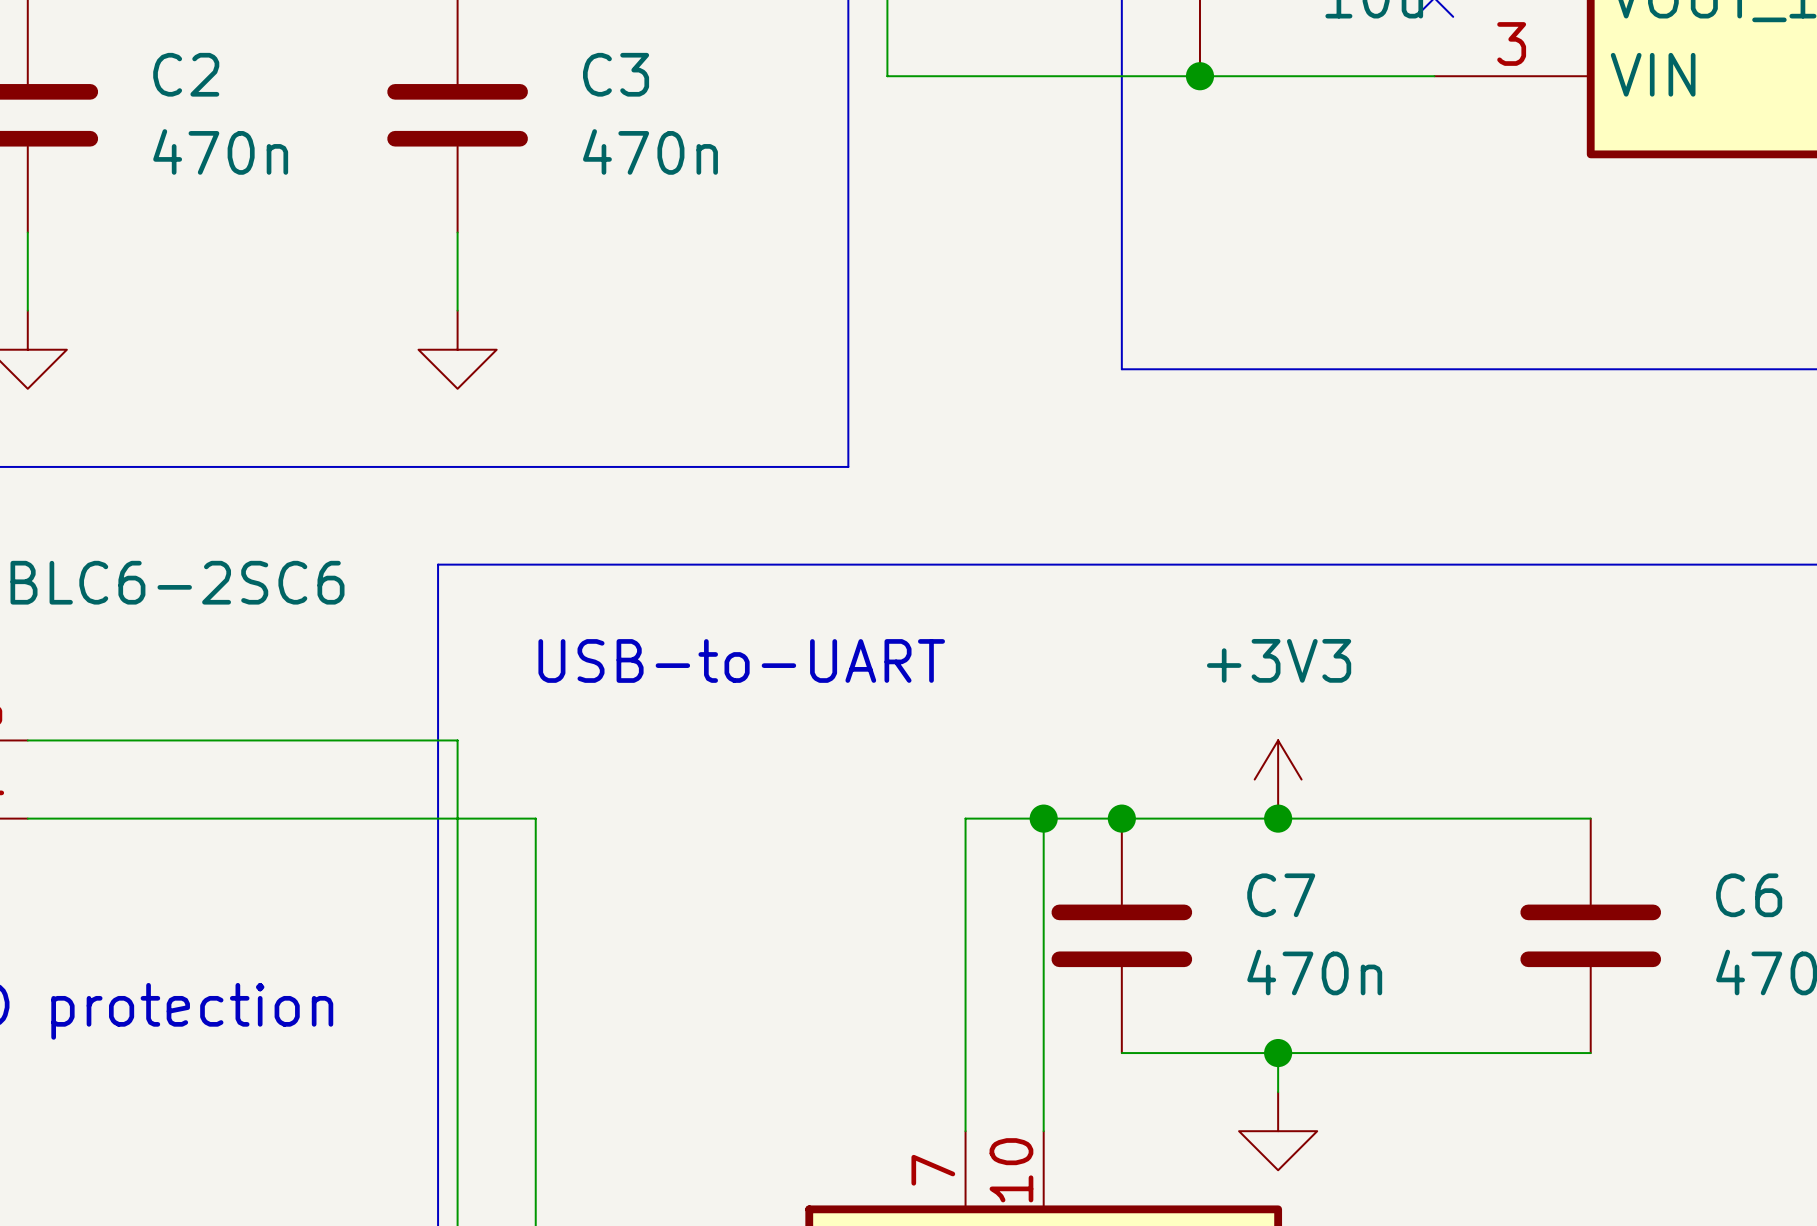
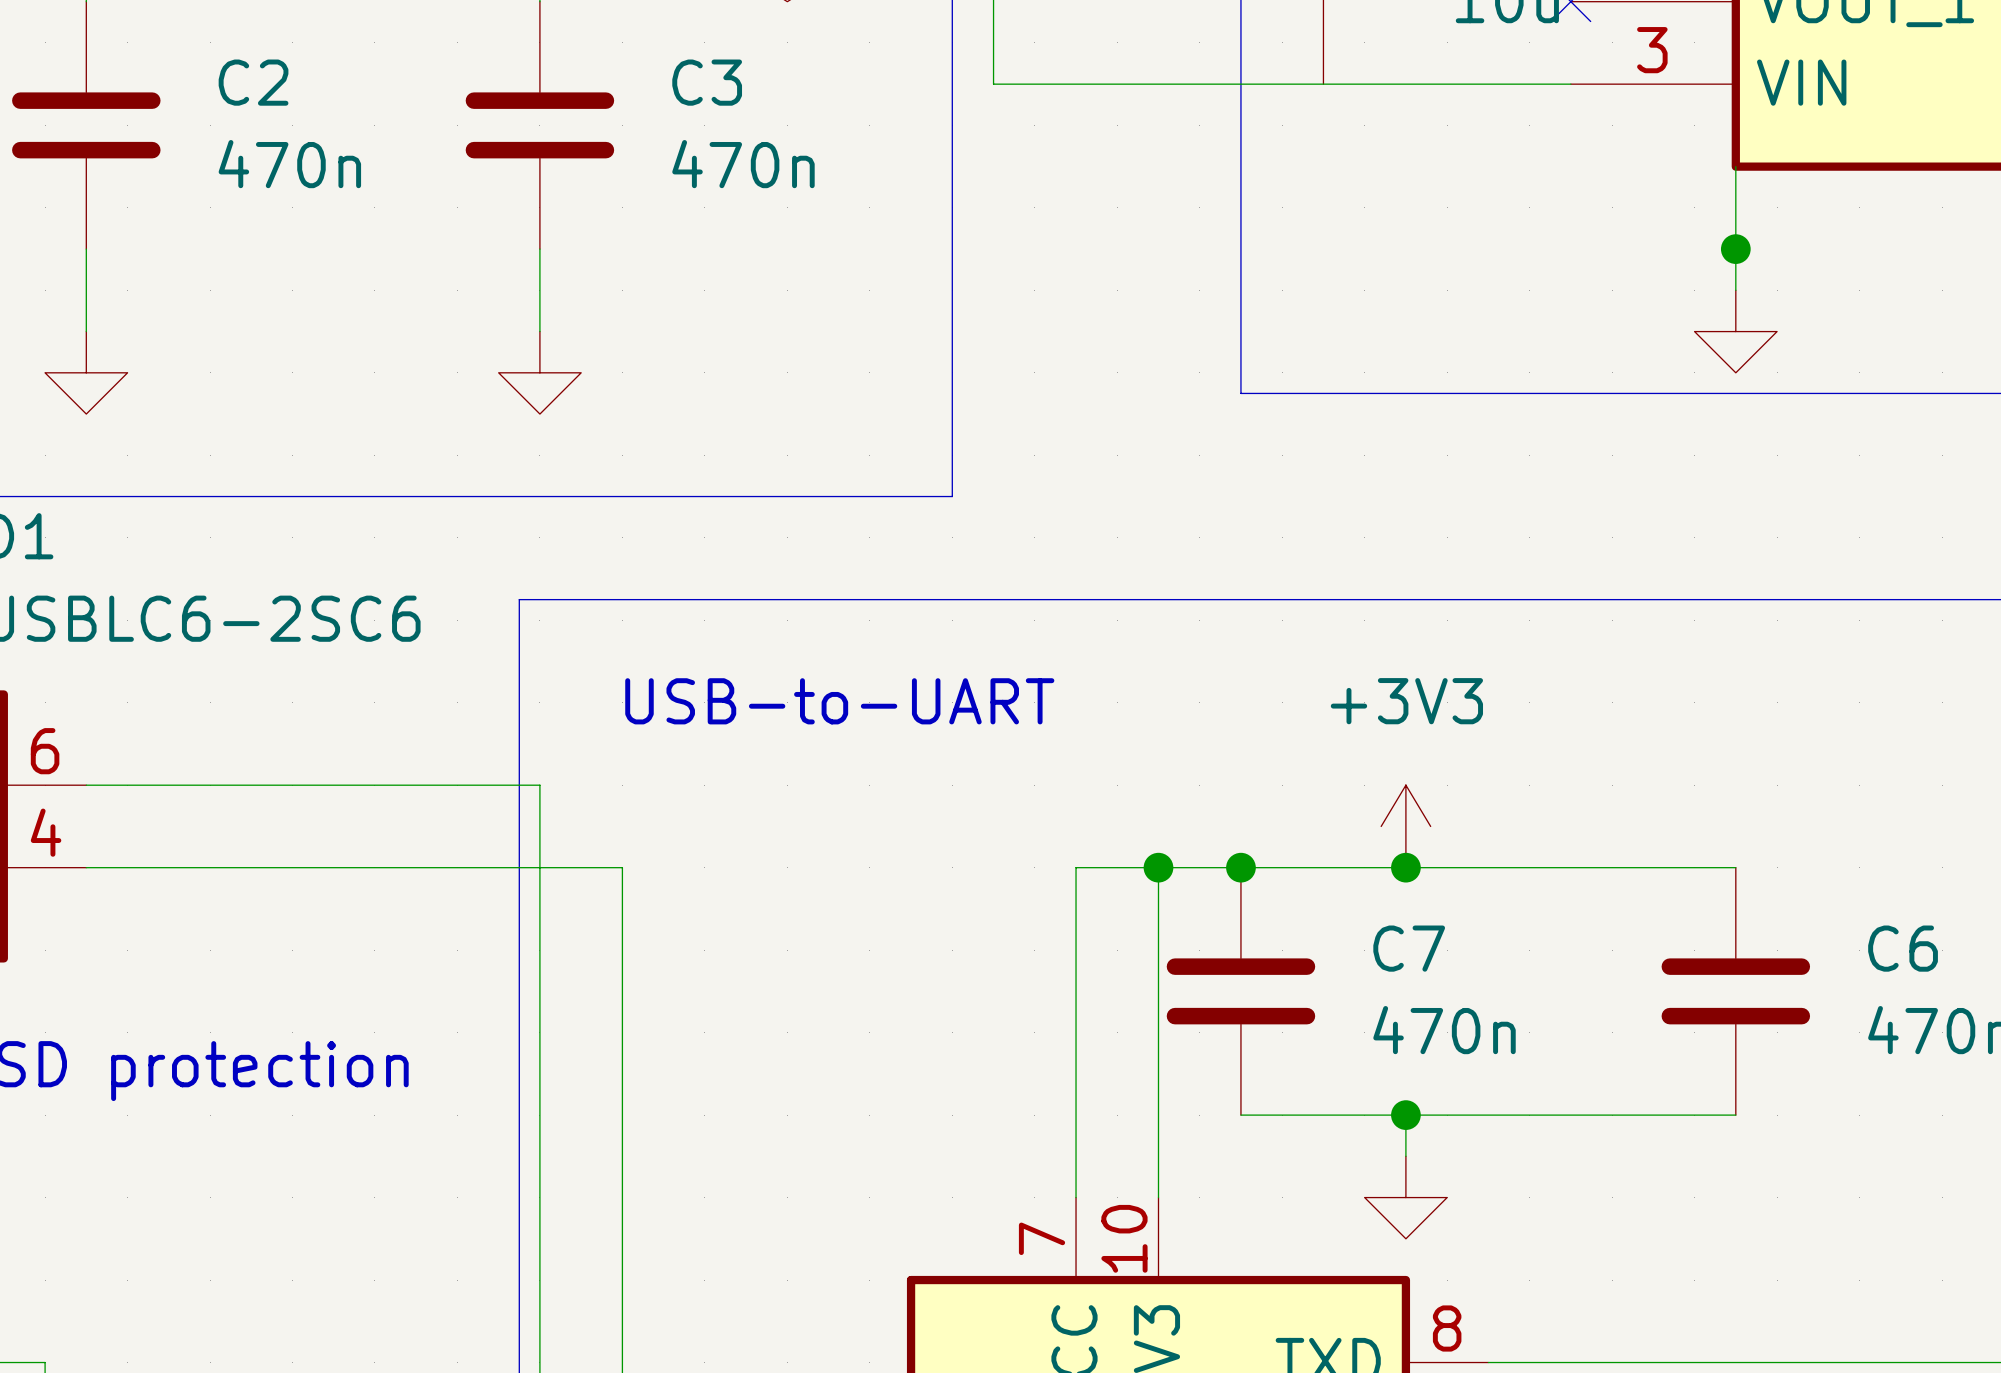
junction: (1199, 76) -> none
wire: none -> (1735, 166) (1735, 290)
junction: none -> (1735, 249)
power symbol: none -> (1735, 331)

